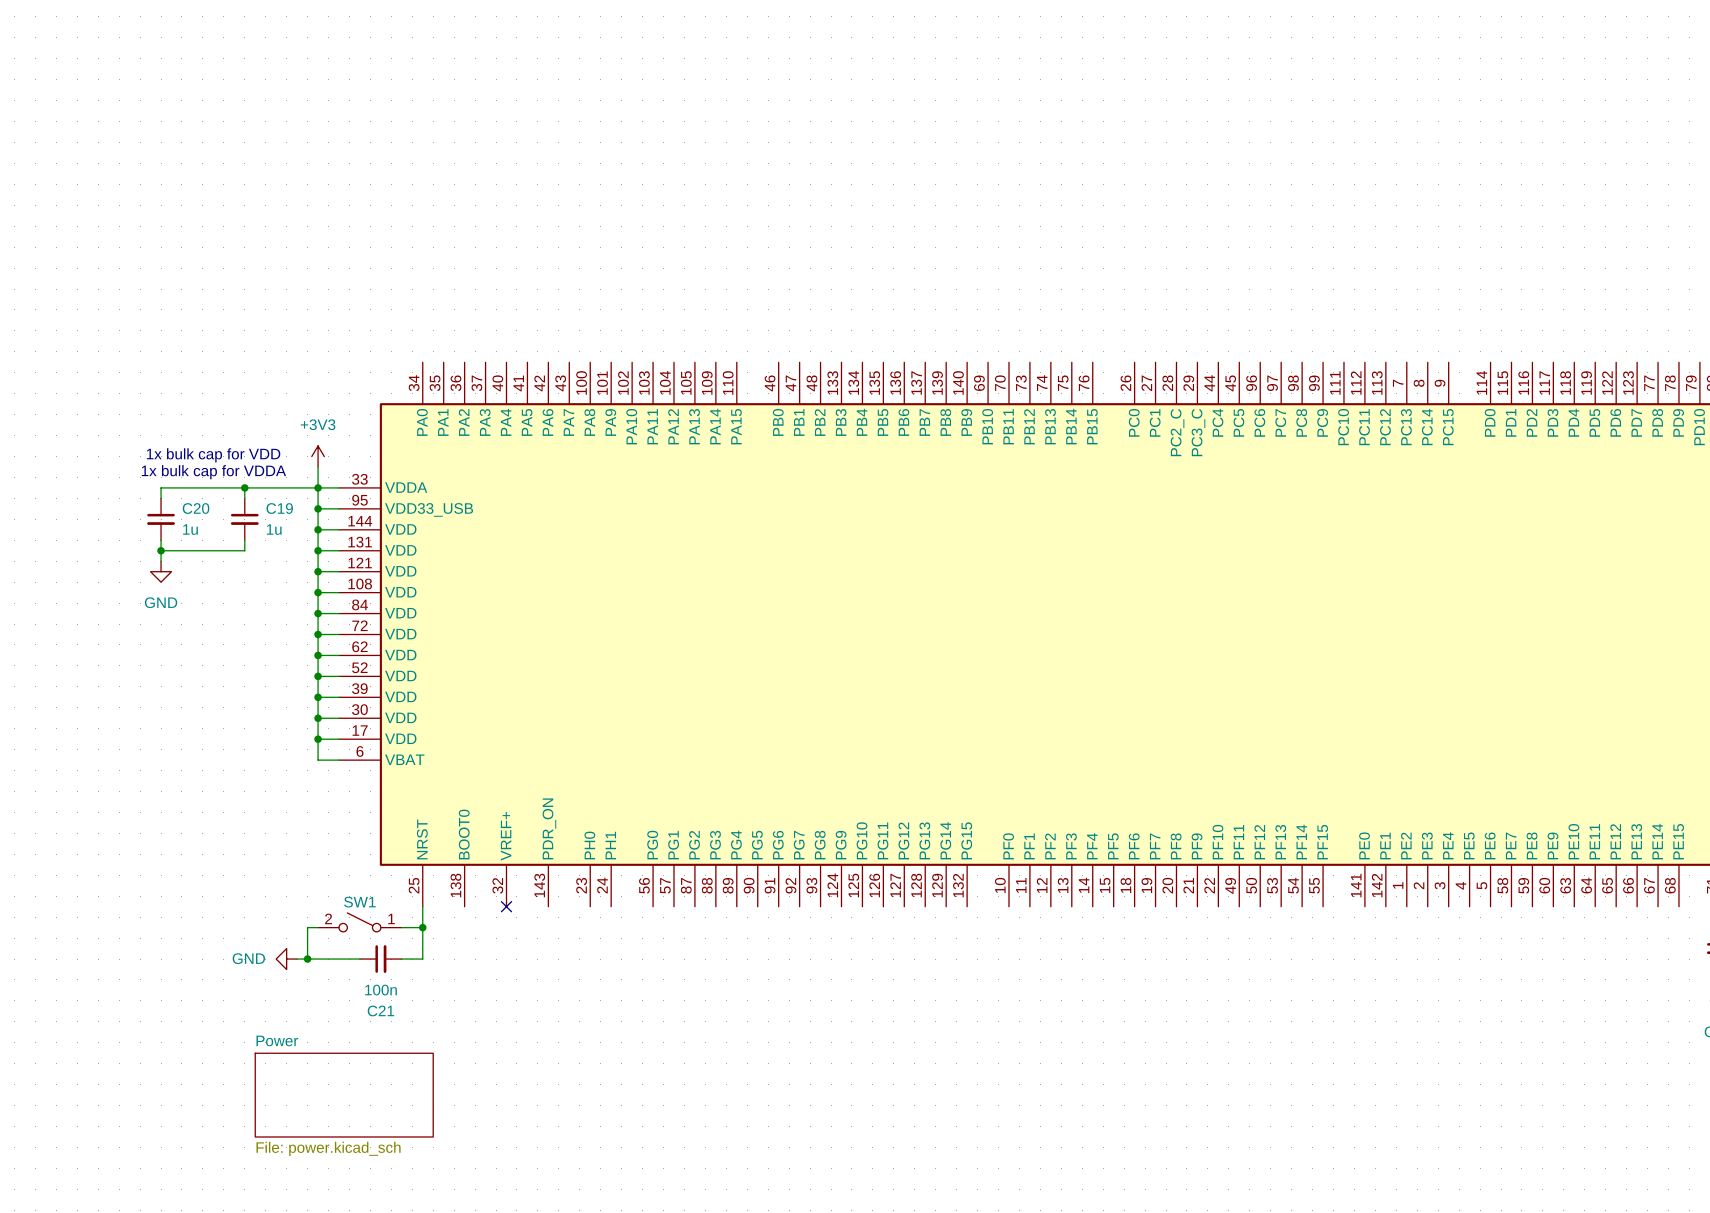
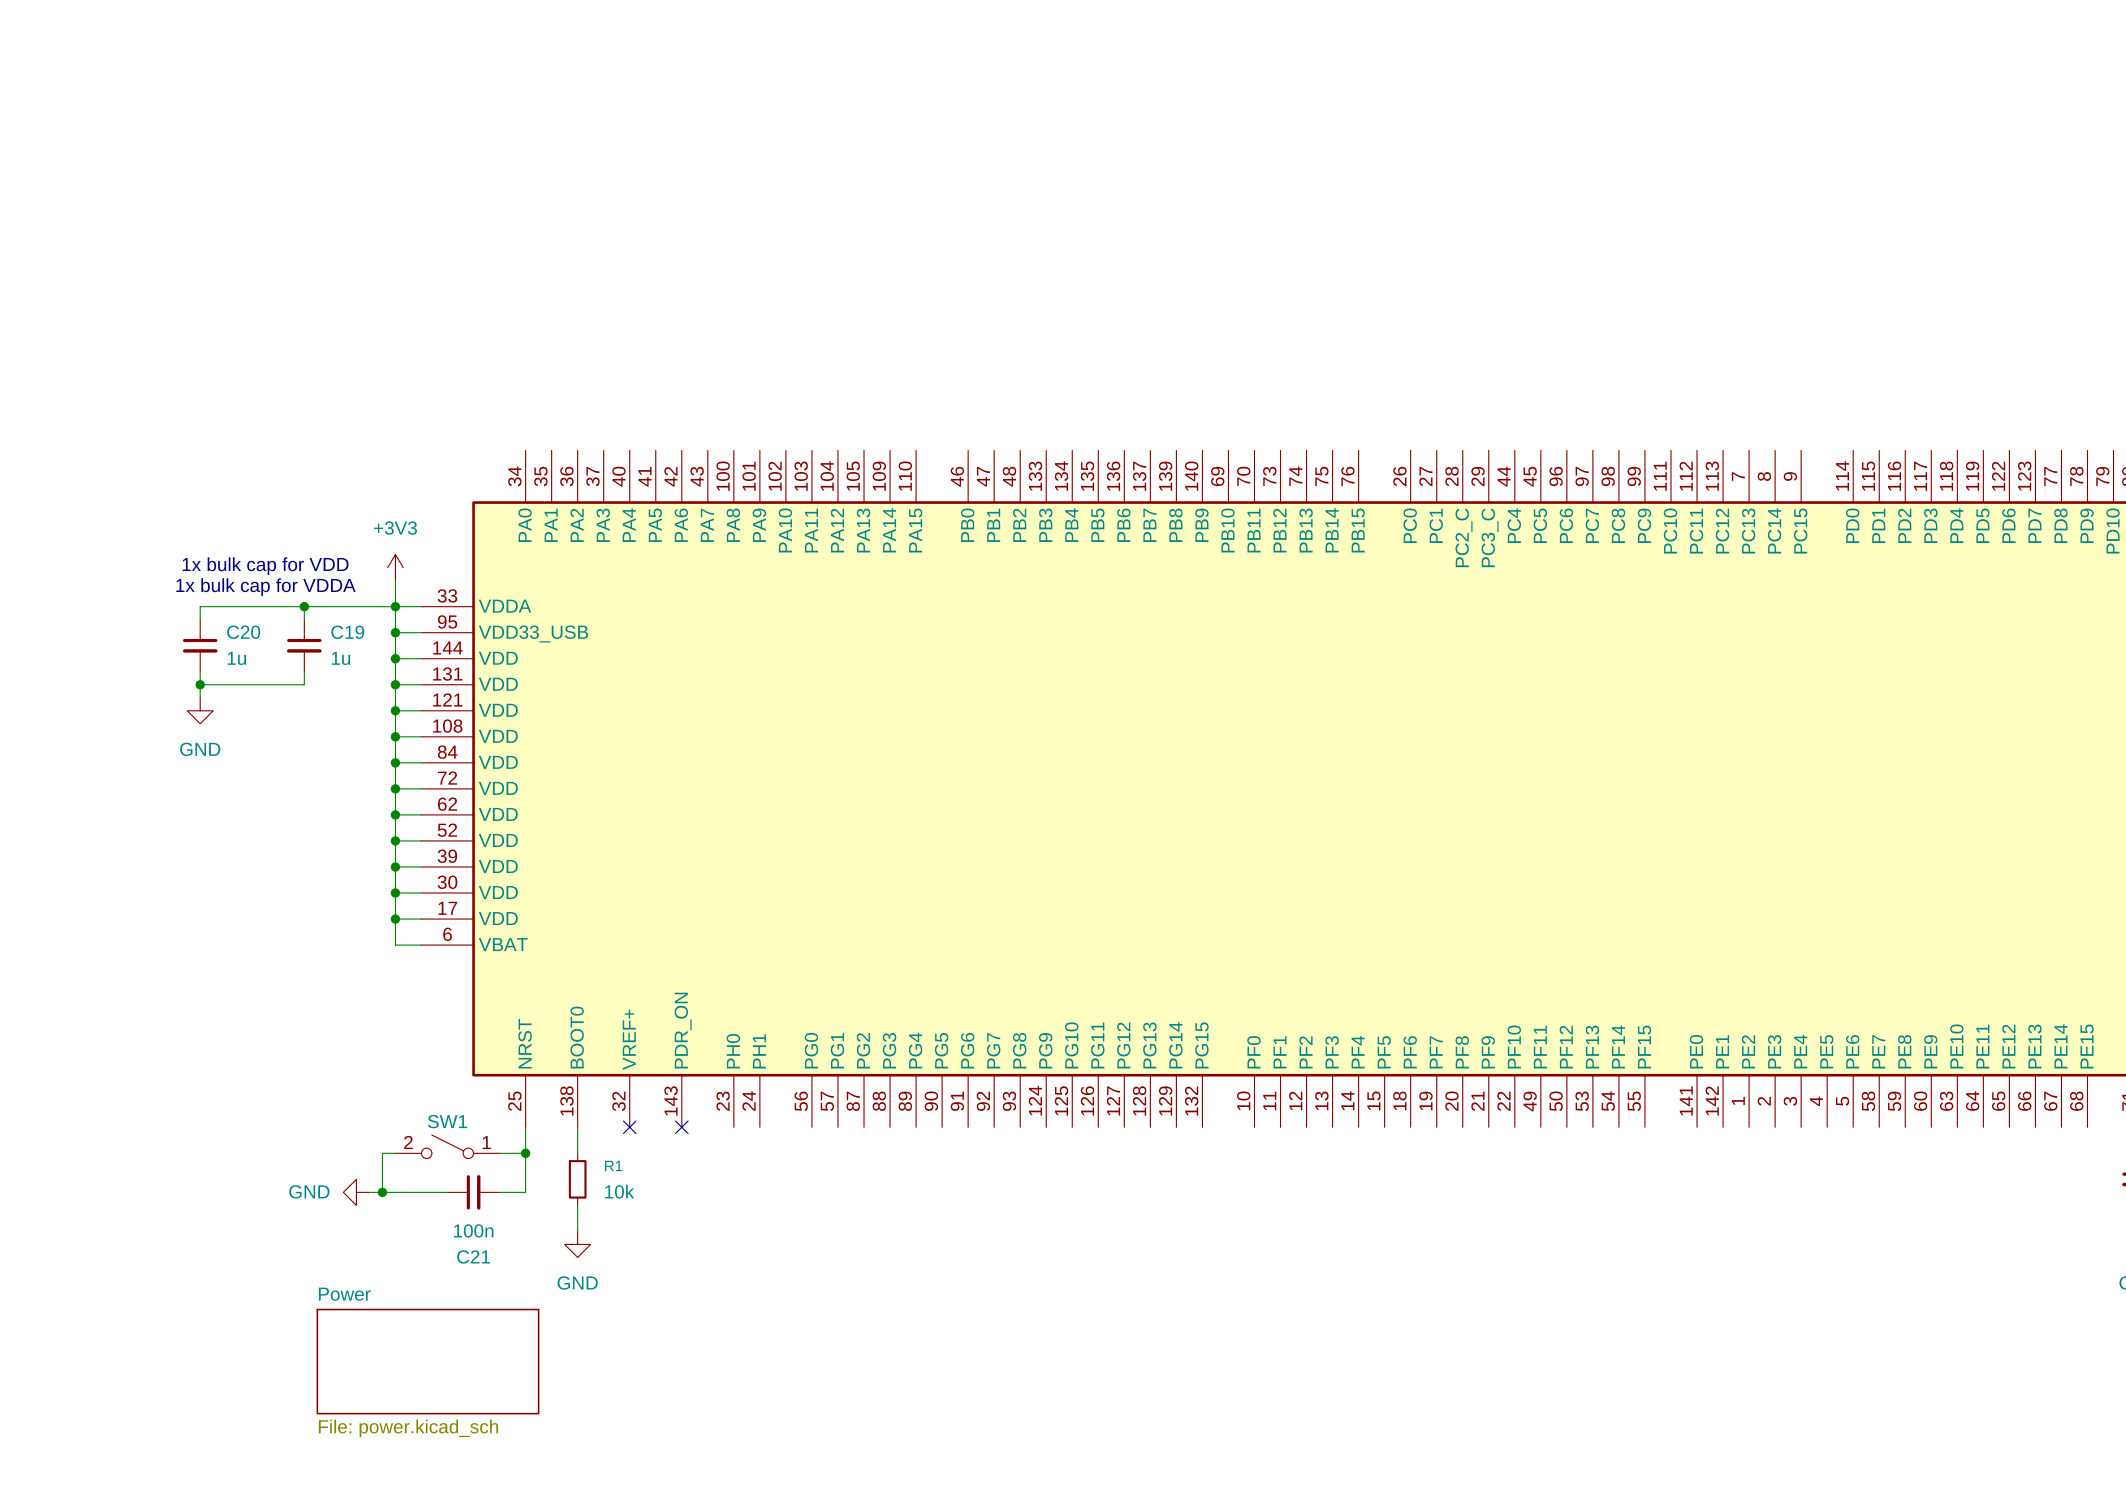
wire: none -> (577, 1127) (577, 1153)
no-connect mark: none -> (681, 1127)
R1: none -> 10k (577, 1179)
wire: none -> (577, 1205) (577, 1231)
power symbol: none -> GND (577, 1244)

